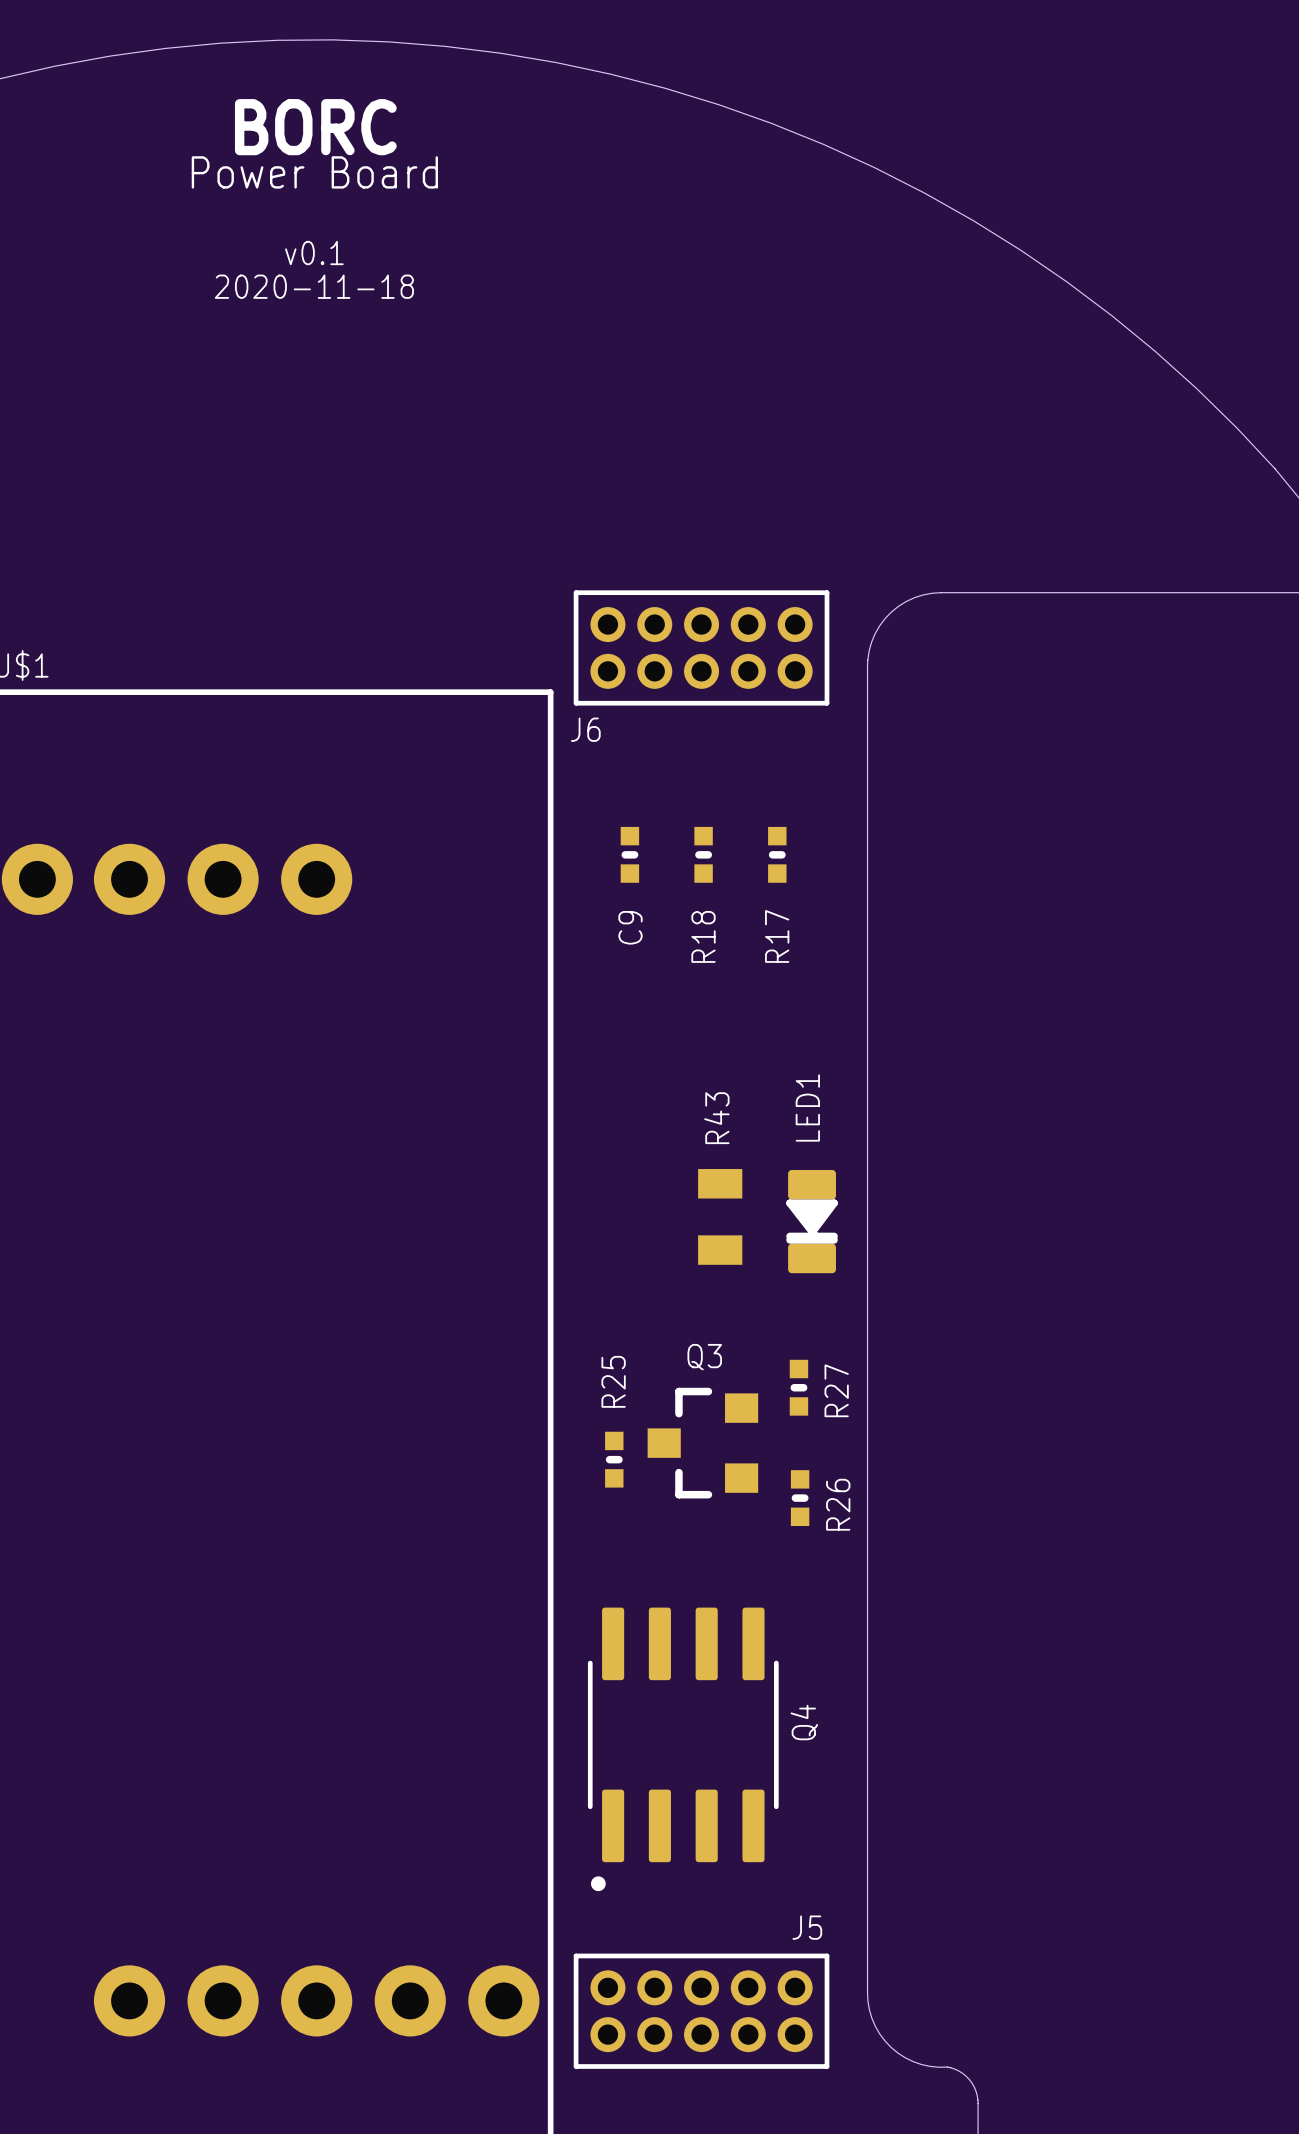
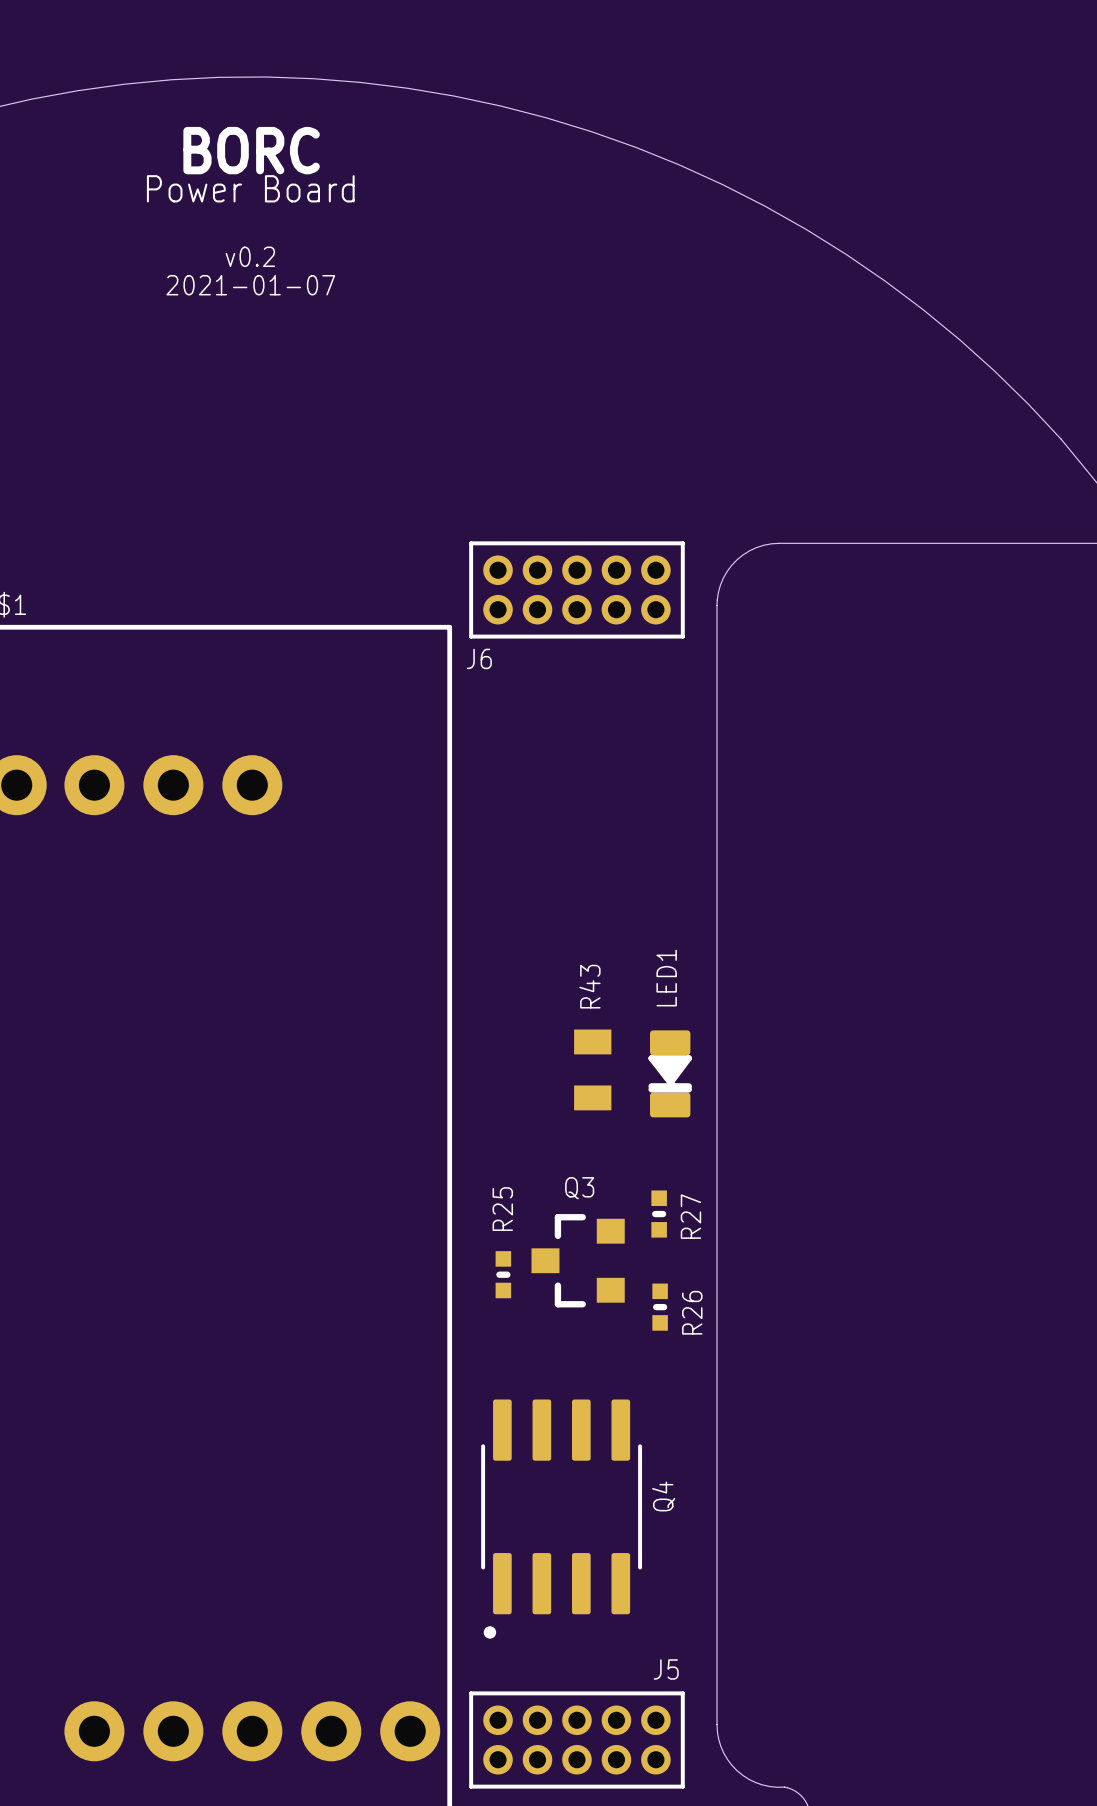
text: v0.1 (314, 253) -> v0.2 (250, 256)
text: 2020-11-18 (314, 286) -> 2021-01-07 (250, 285)
C9: (629, 854) -> none
R18: (703, 854) -> none
R17: (777, 854) -> none

